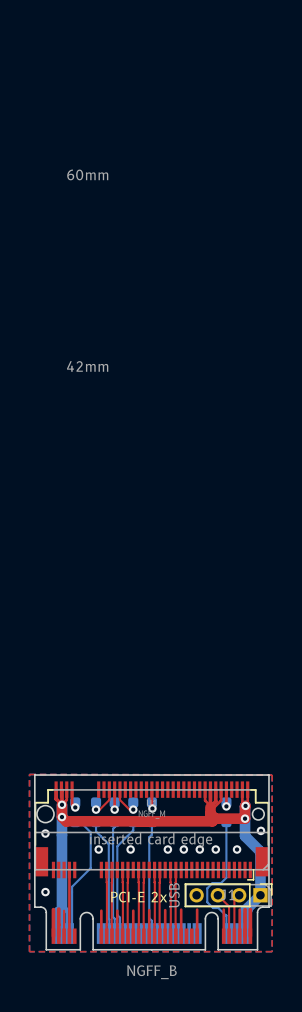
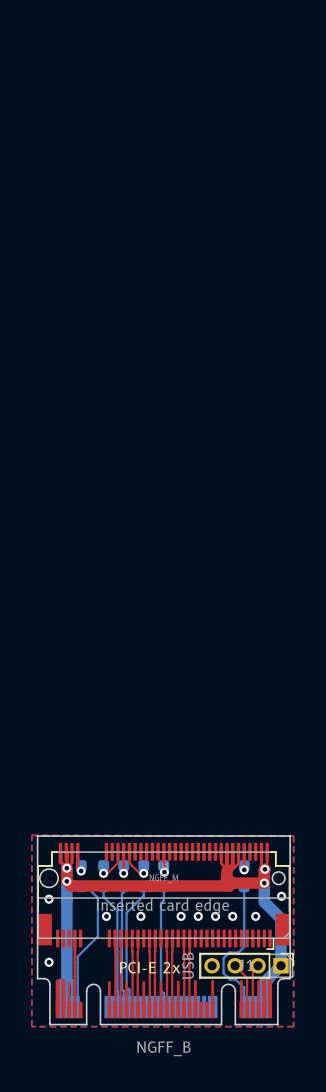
part text: 60mm (87, 174) -> none
part text: 42mm (87, 366) -> none

